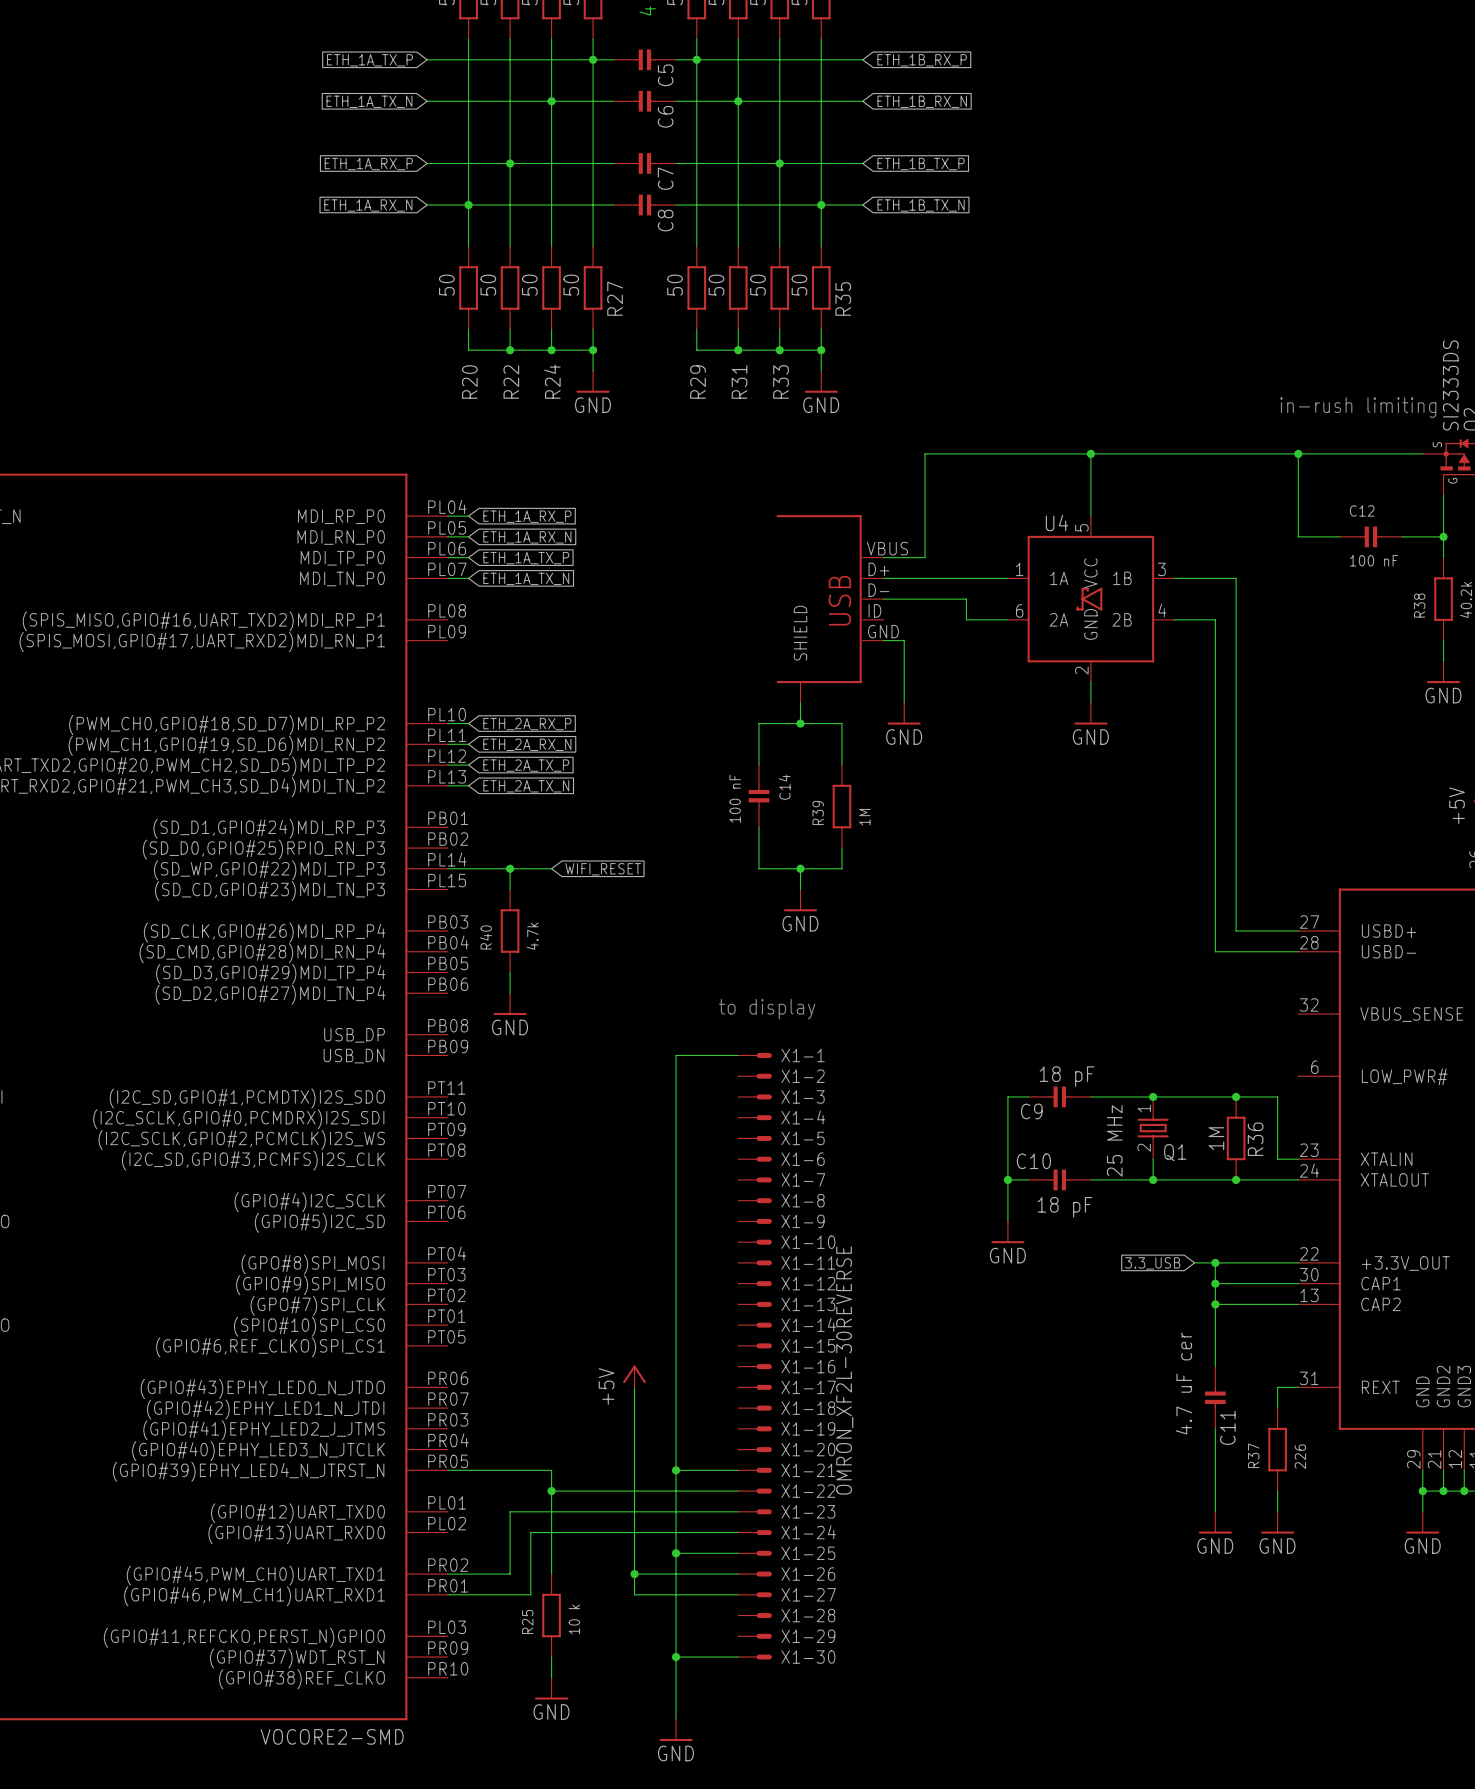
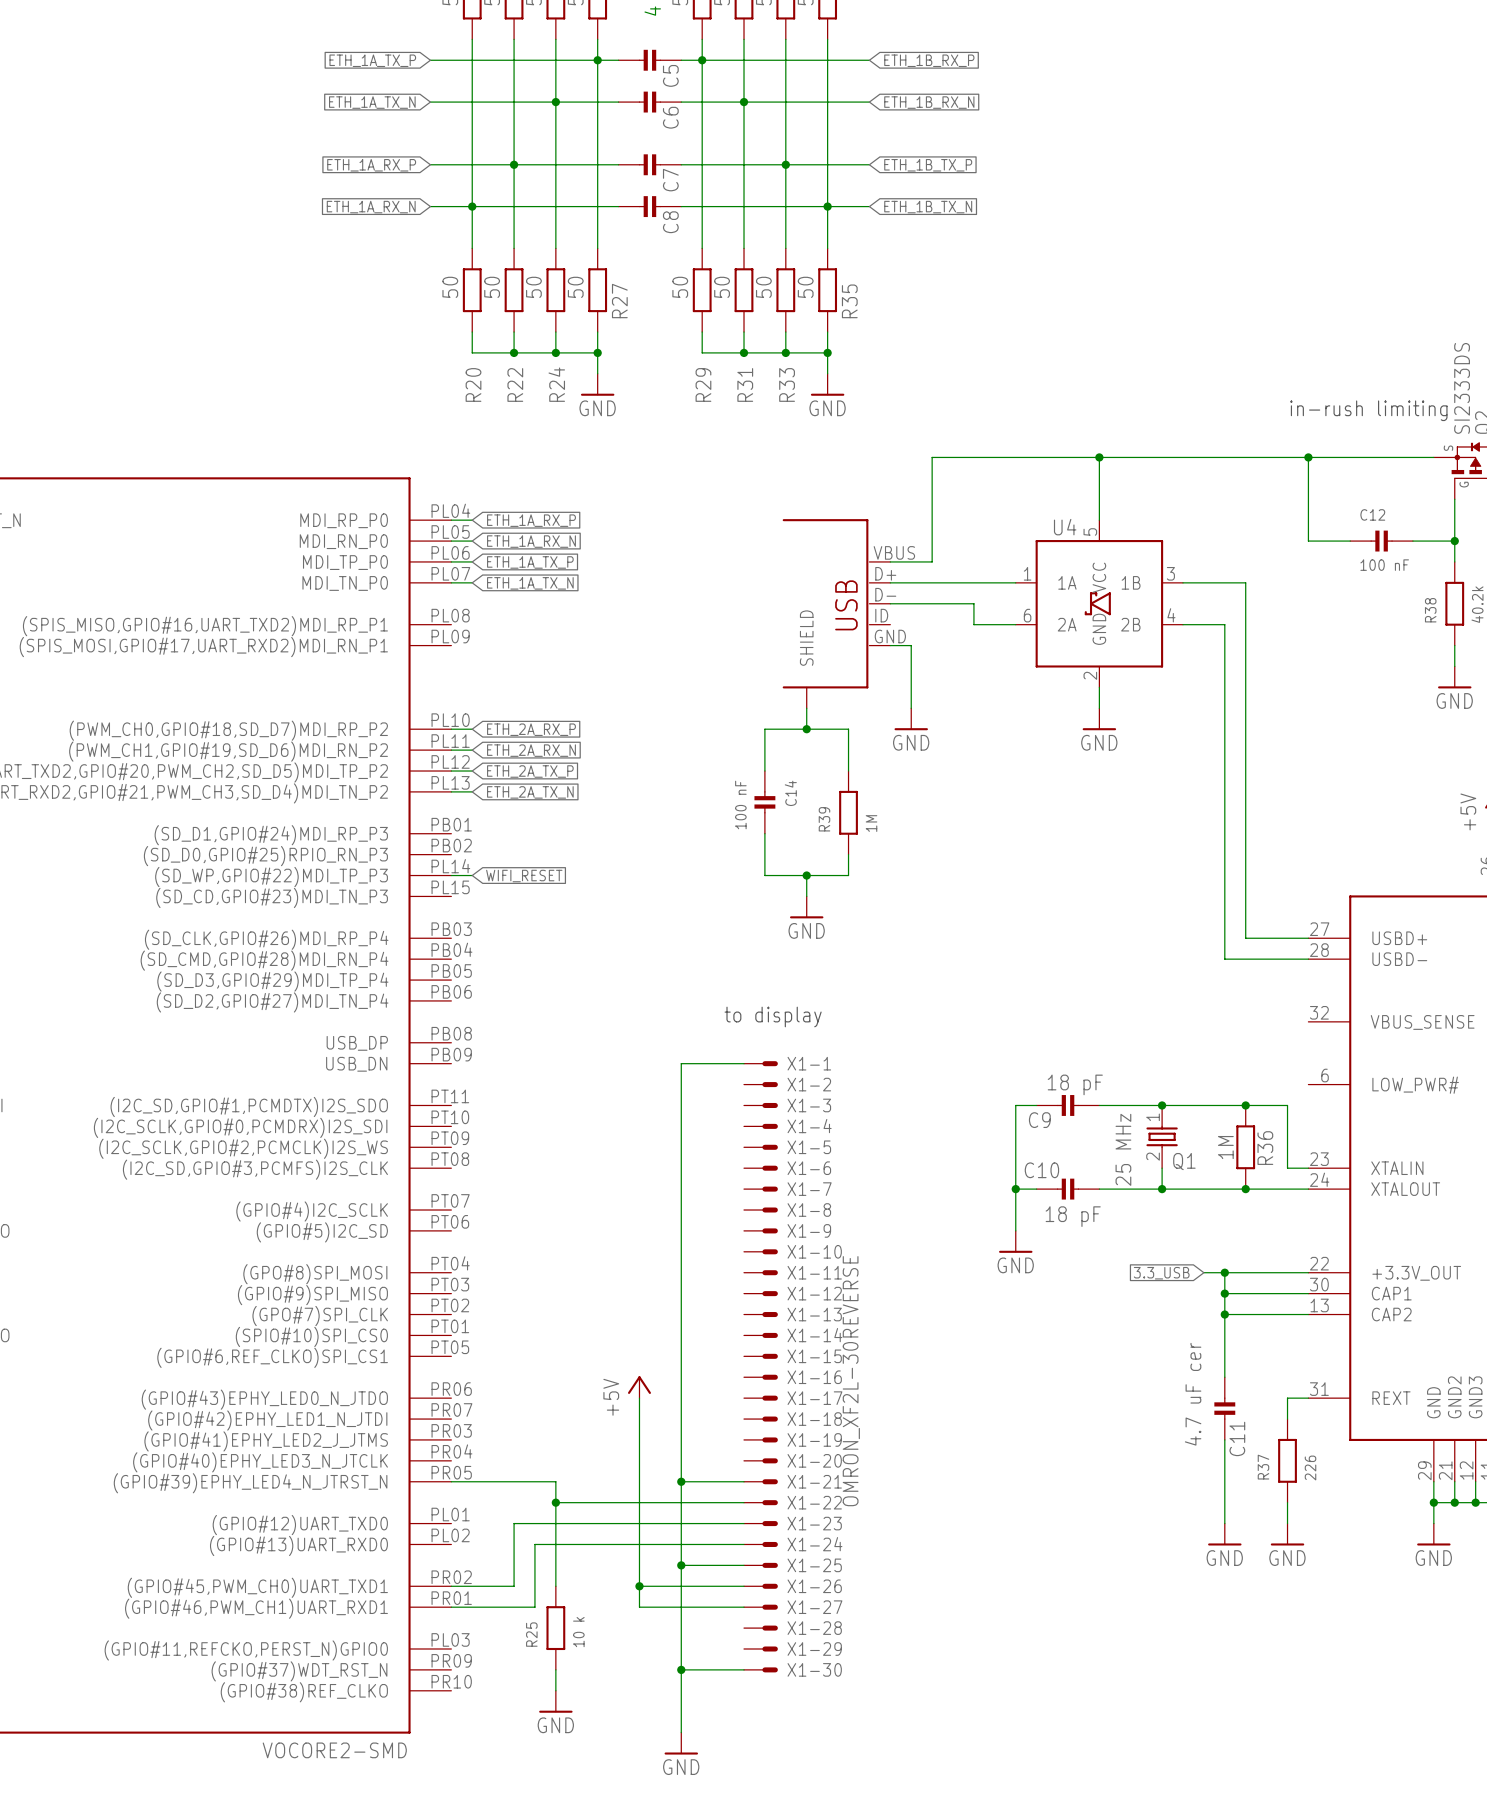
wire: (468, 868) (551, 868) -> none
wire: (510, 868) (510, 889) -> none
junction: (510, 868) -> none
global label position: WIFI_RESET (603, 869) -> WIFI_RESET (524, 876)
R40: 4.7k (510, 931) -> none
wire: (510, 972) (510, 993) -> none
power symbol: GND (510, 1004) -> none

